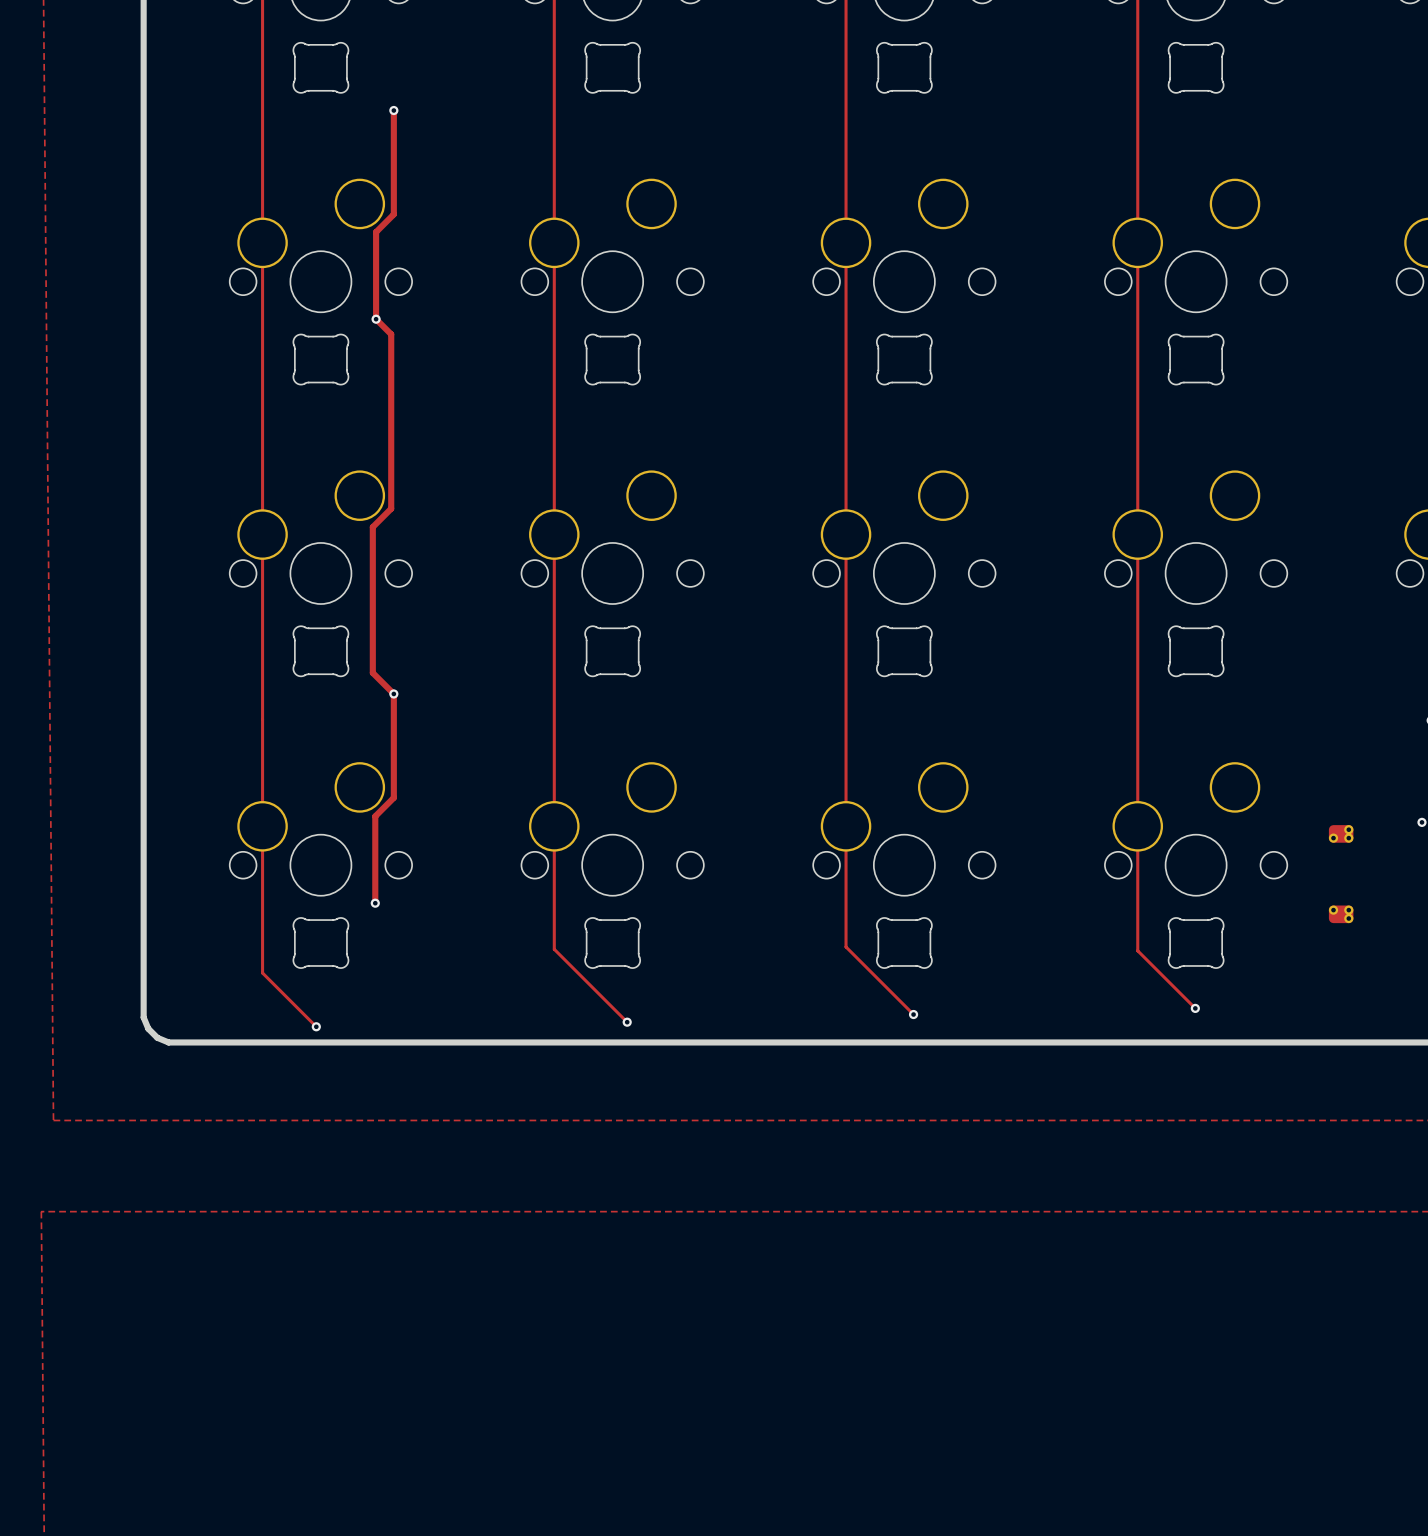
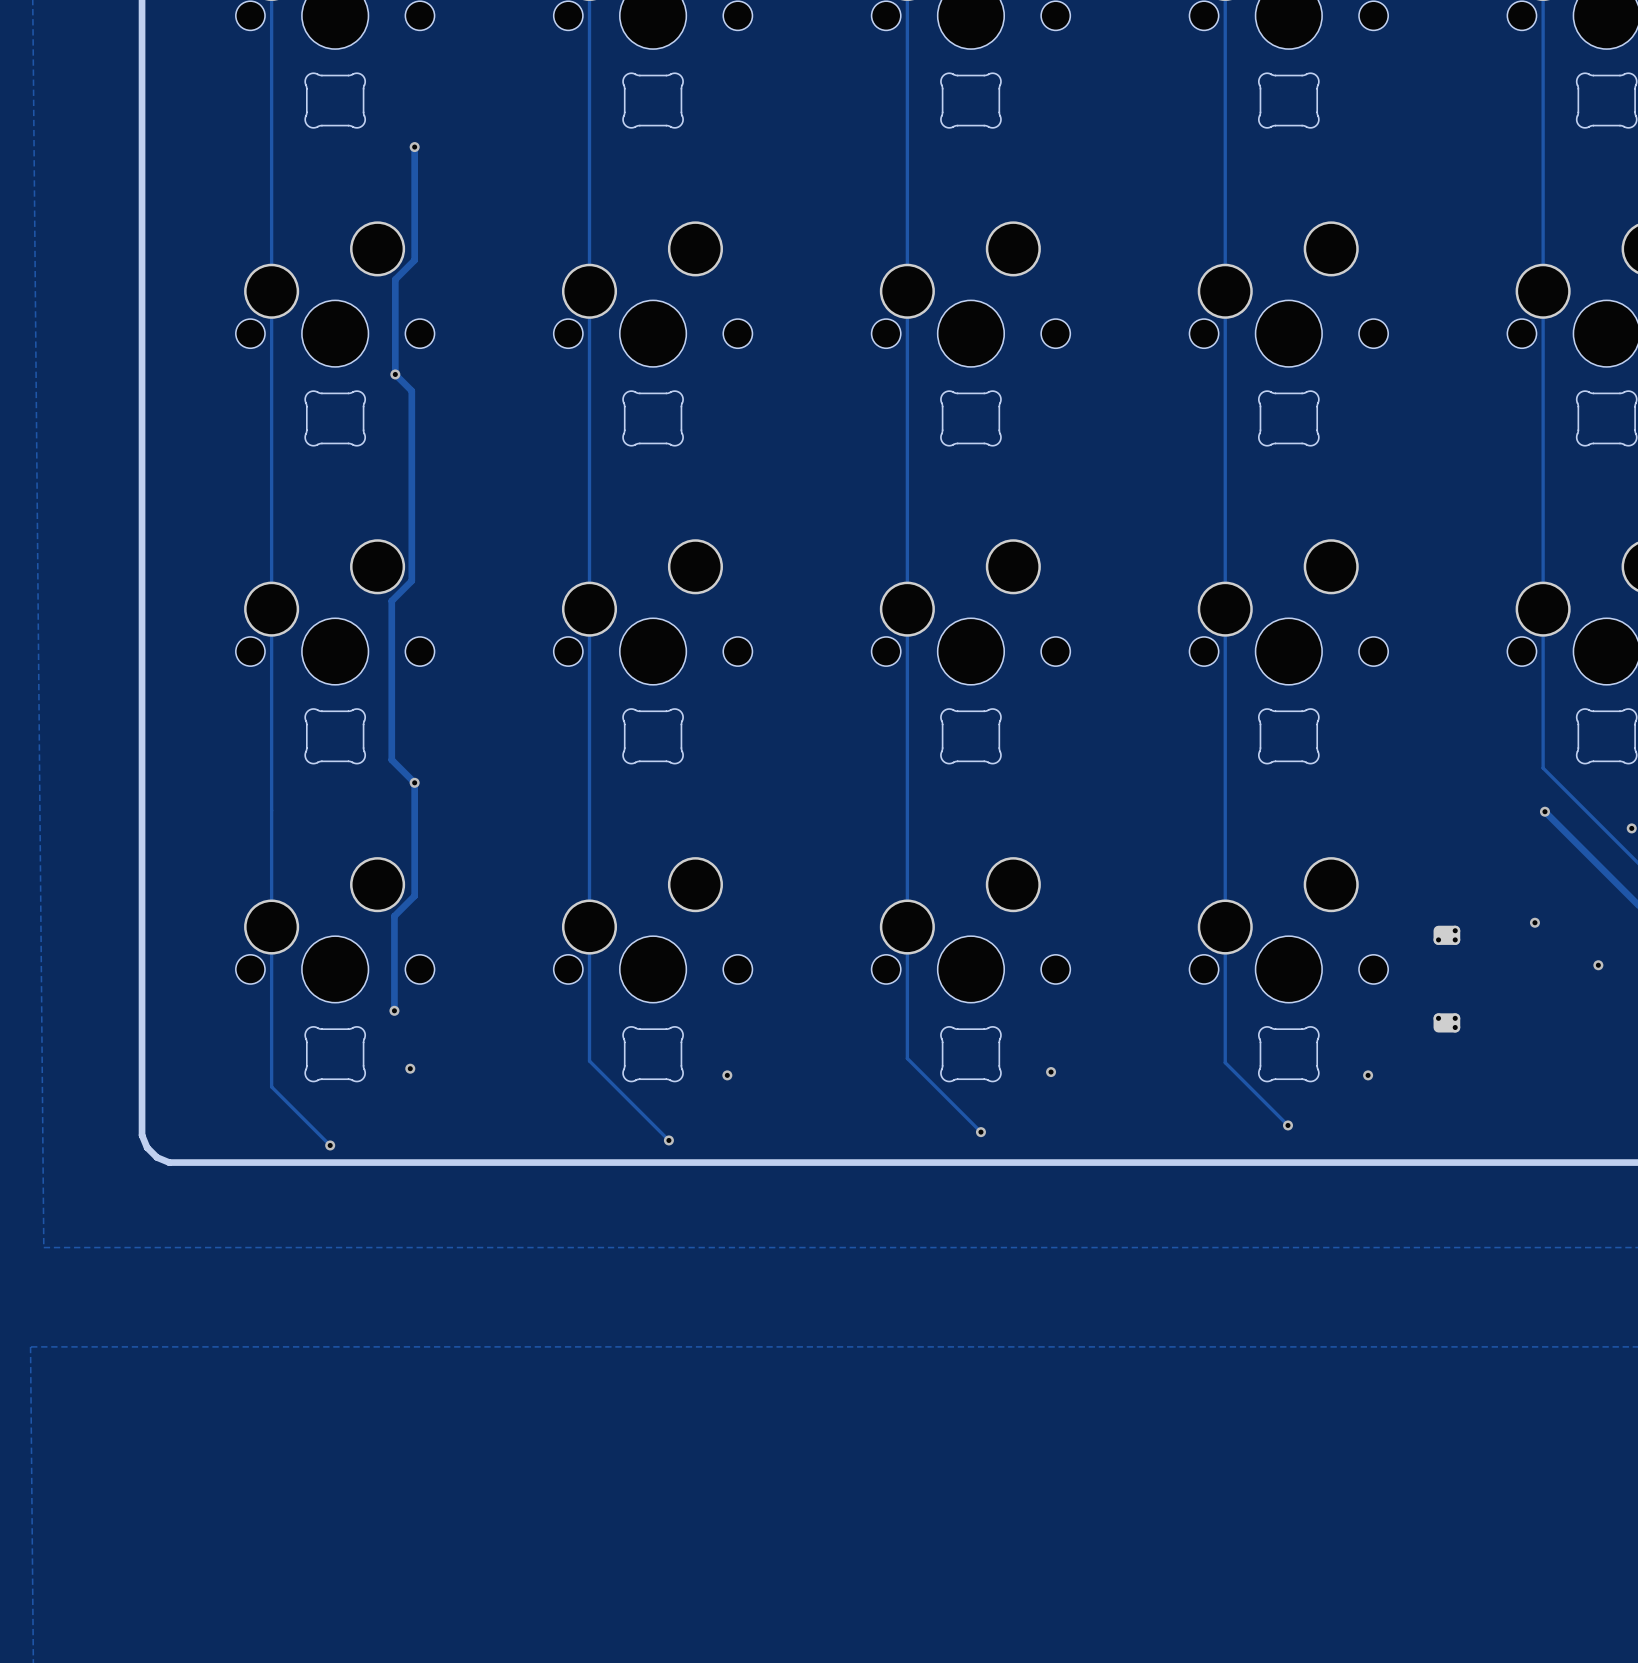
via: none -> (410, 1068)
via: none -> (1051, 1072)
via: none -> (727, 1075)
via: none -> (1368, 1075)

